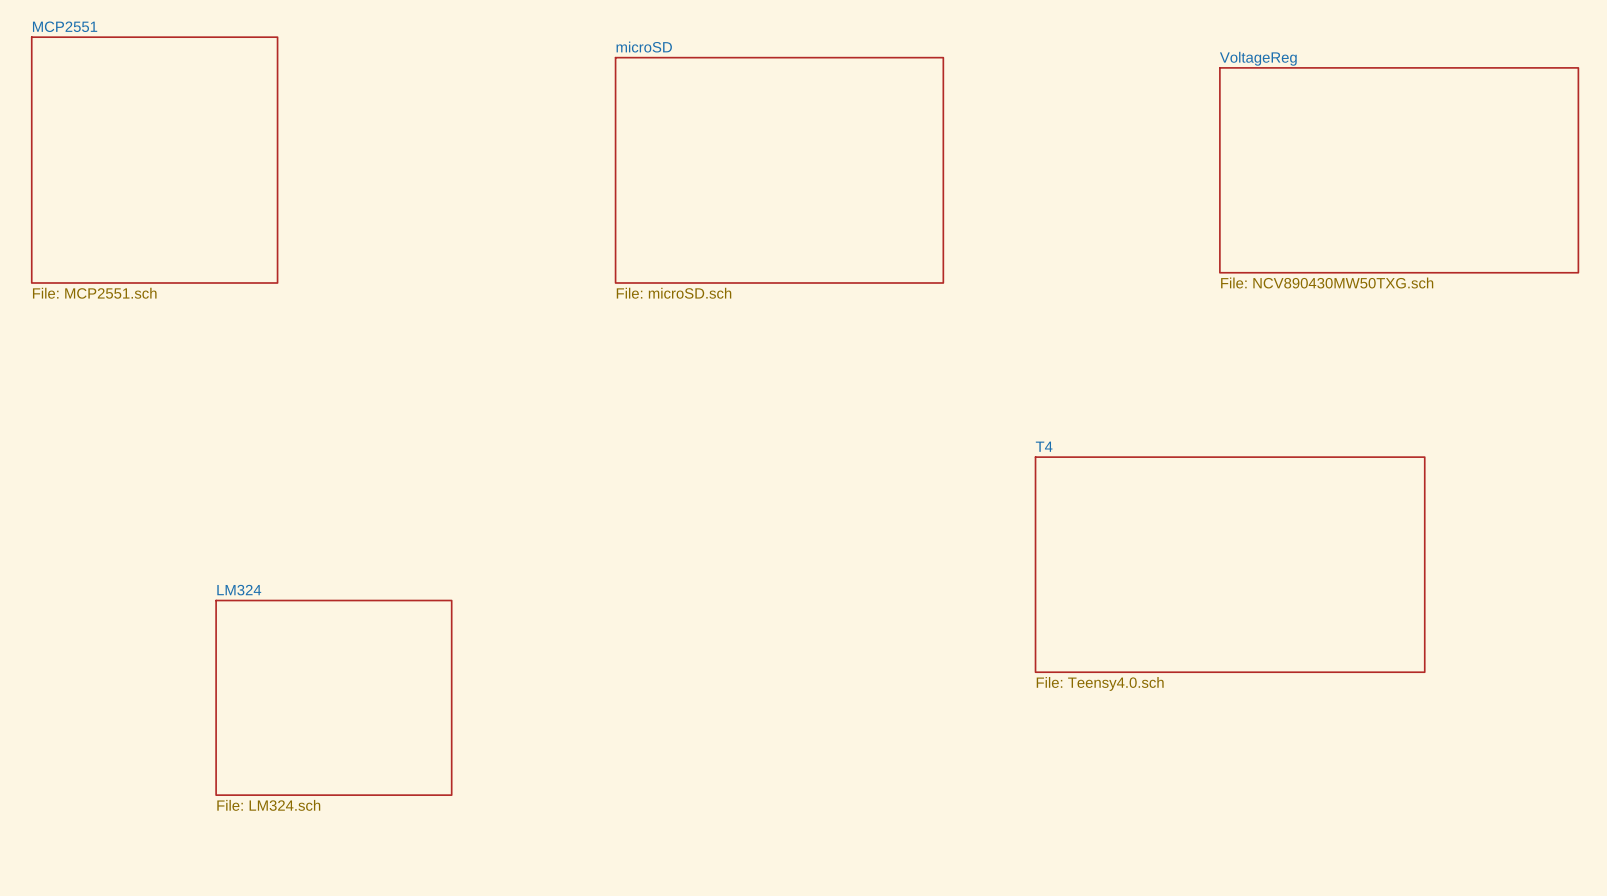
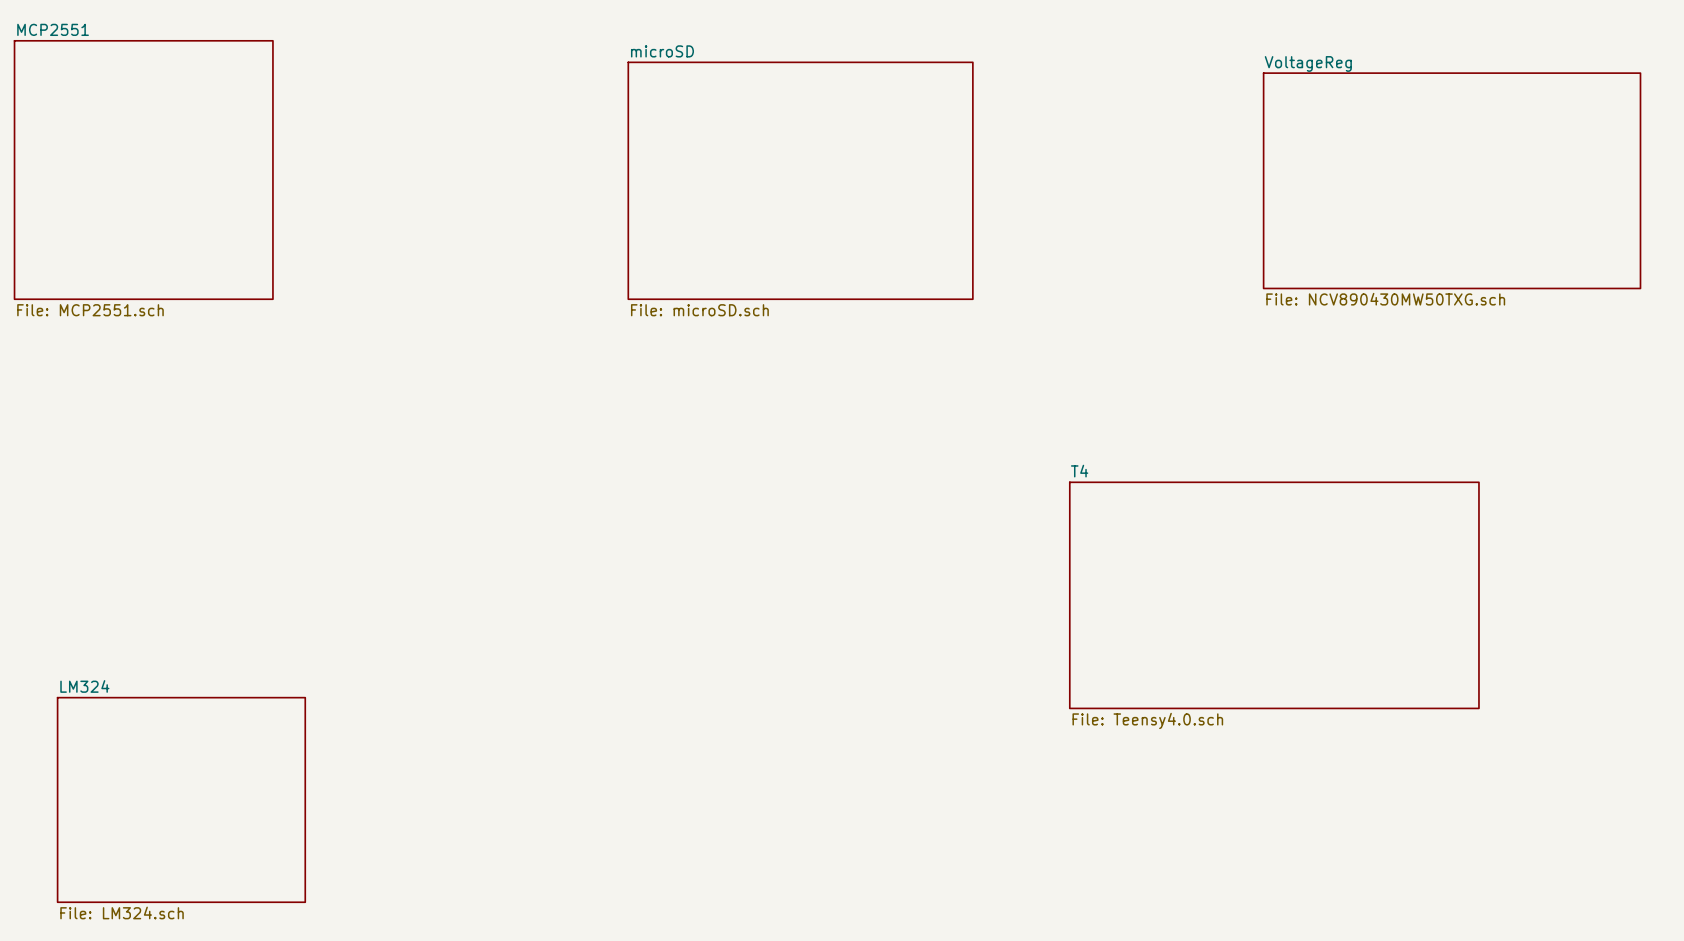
sheet LM324 position: (333, 697) -> (181, 799)

